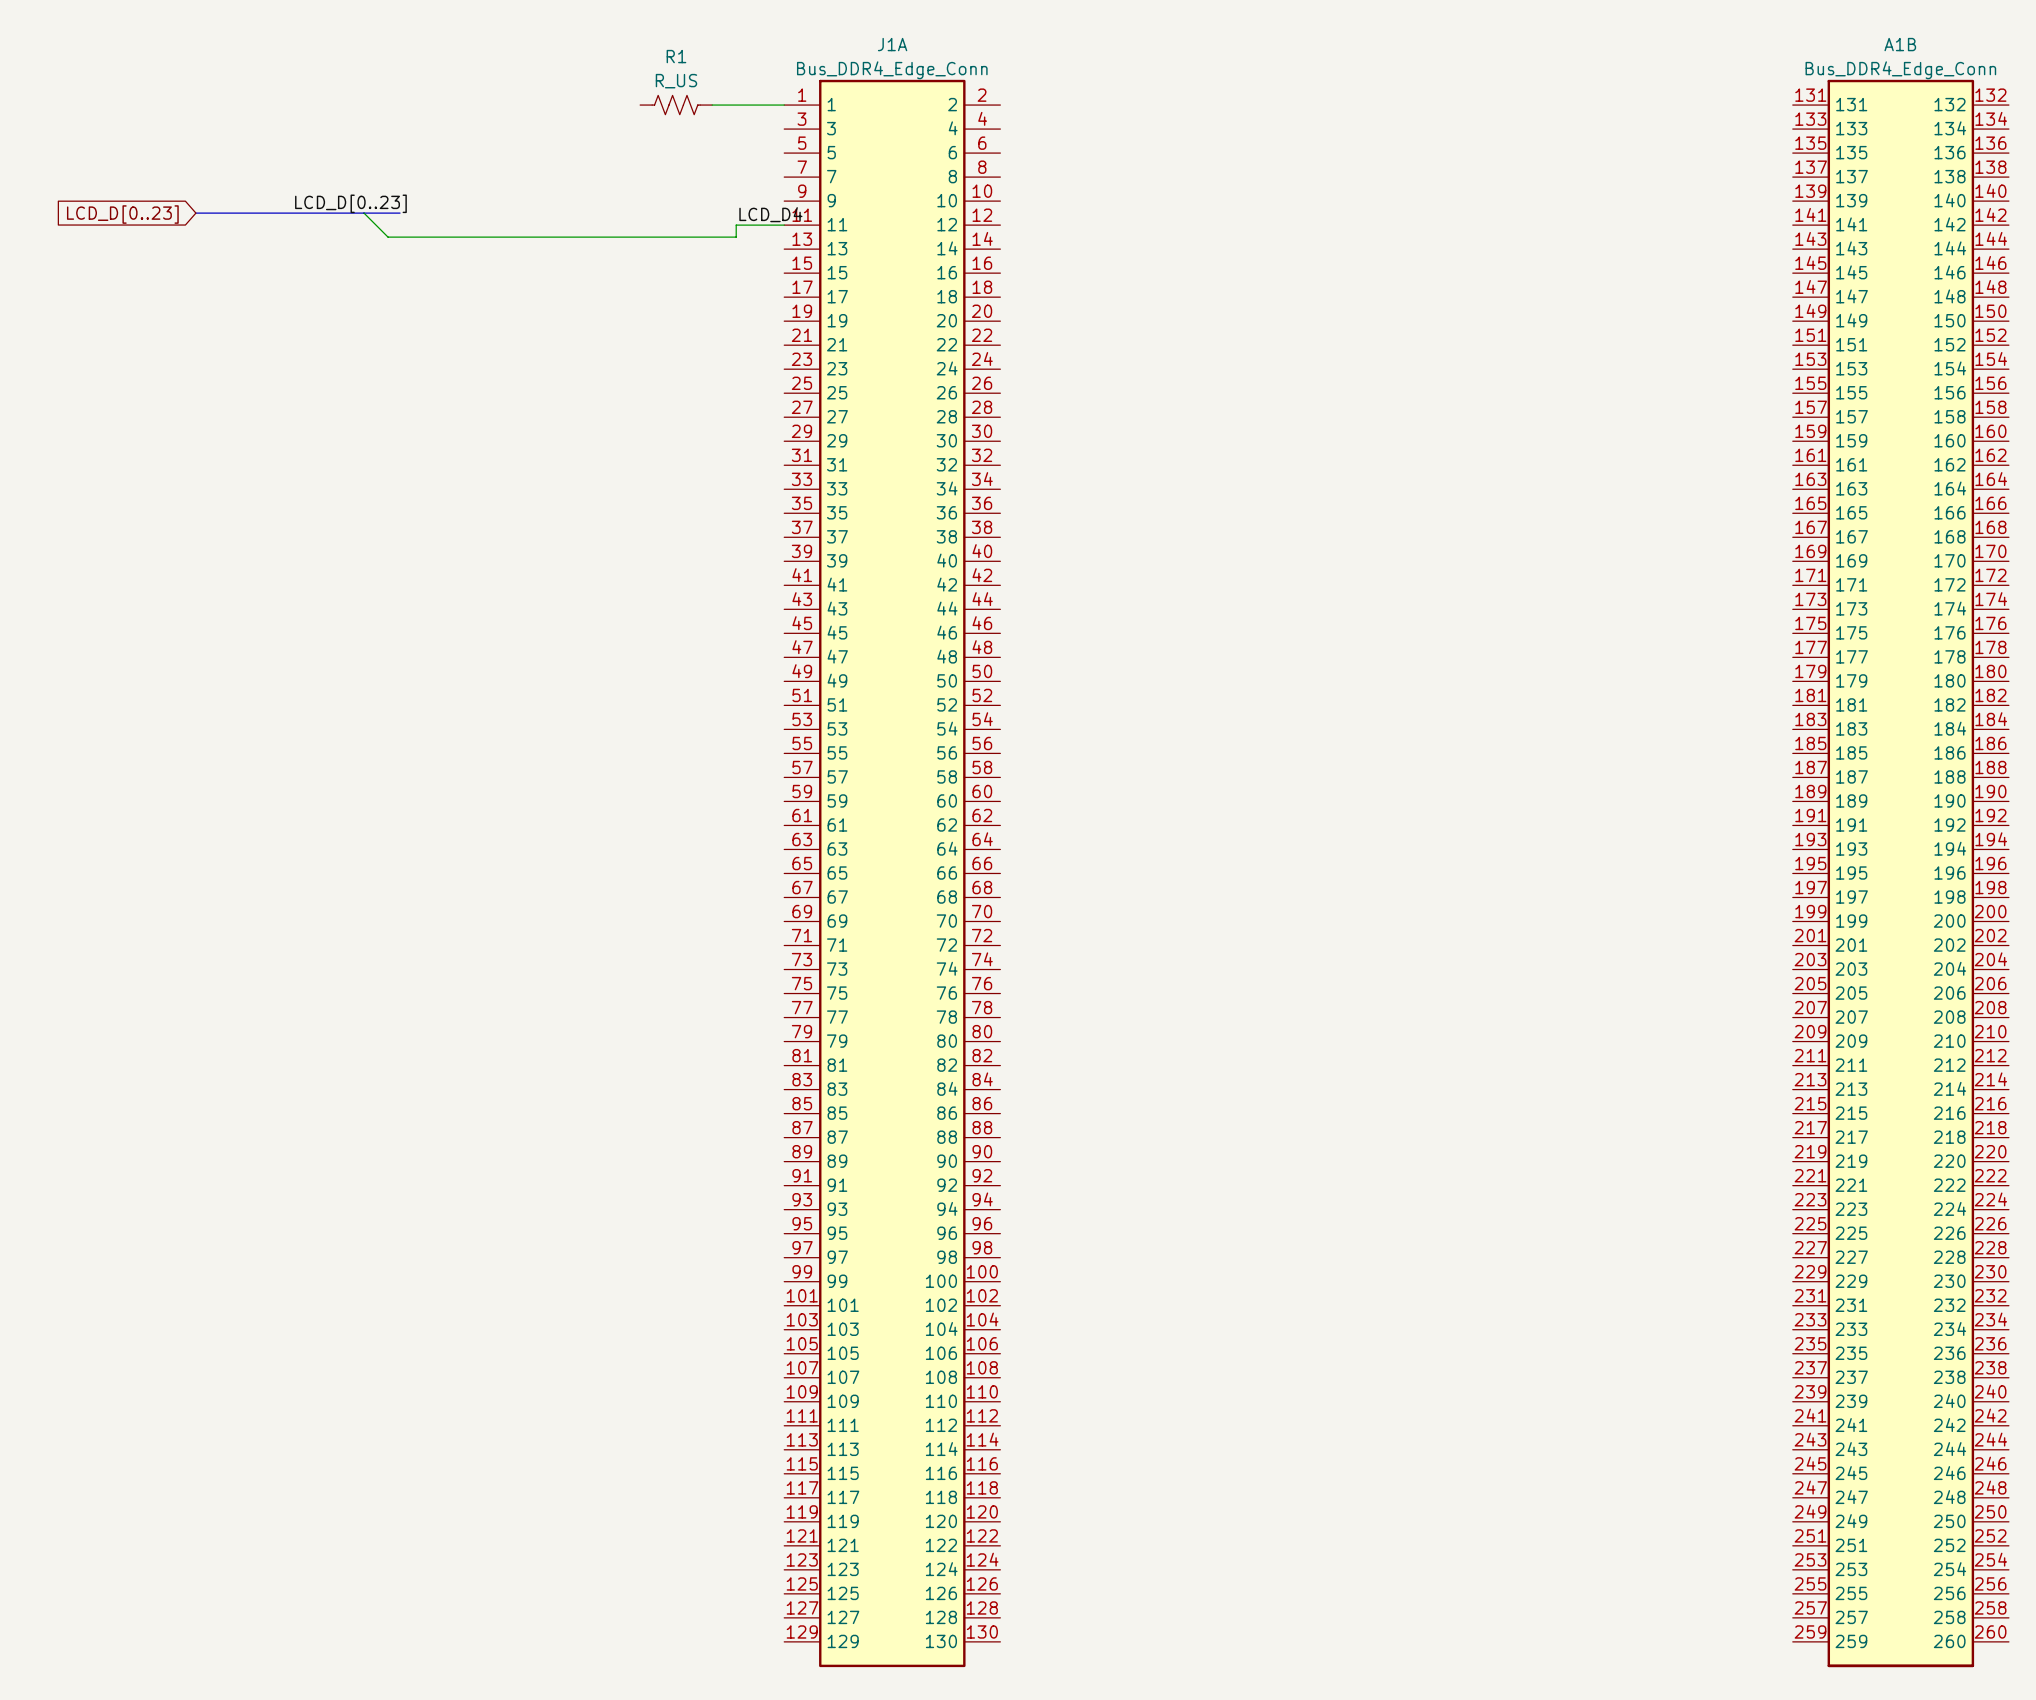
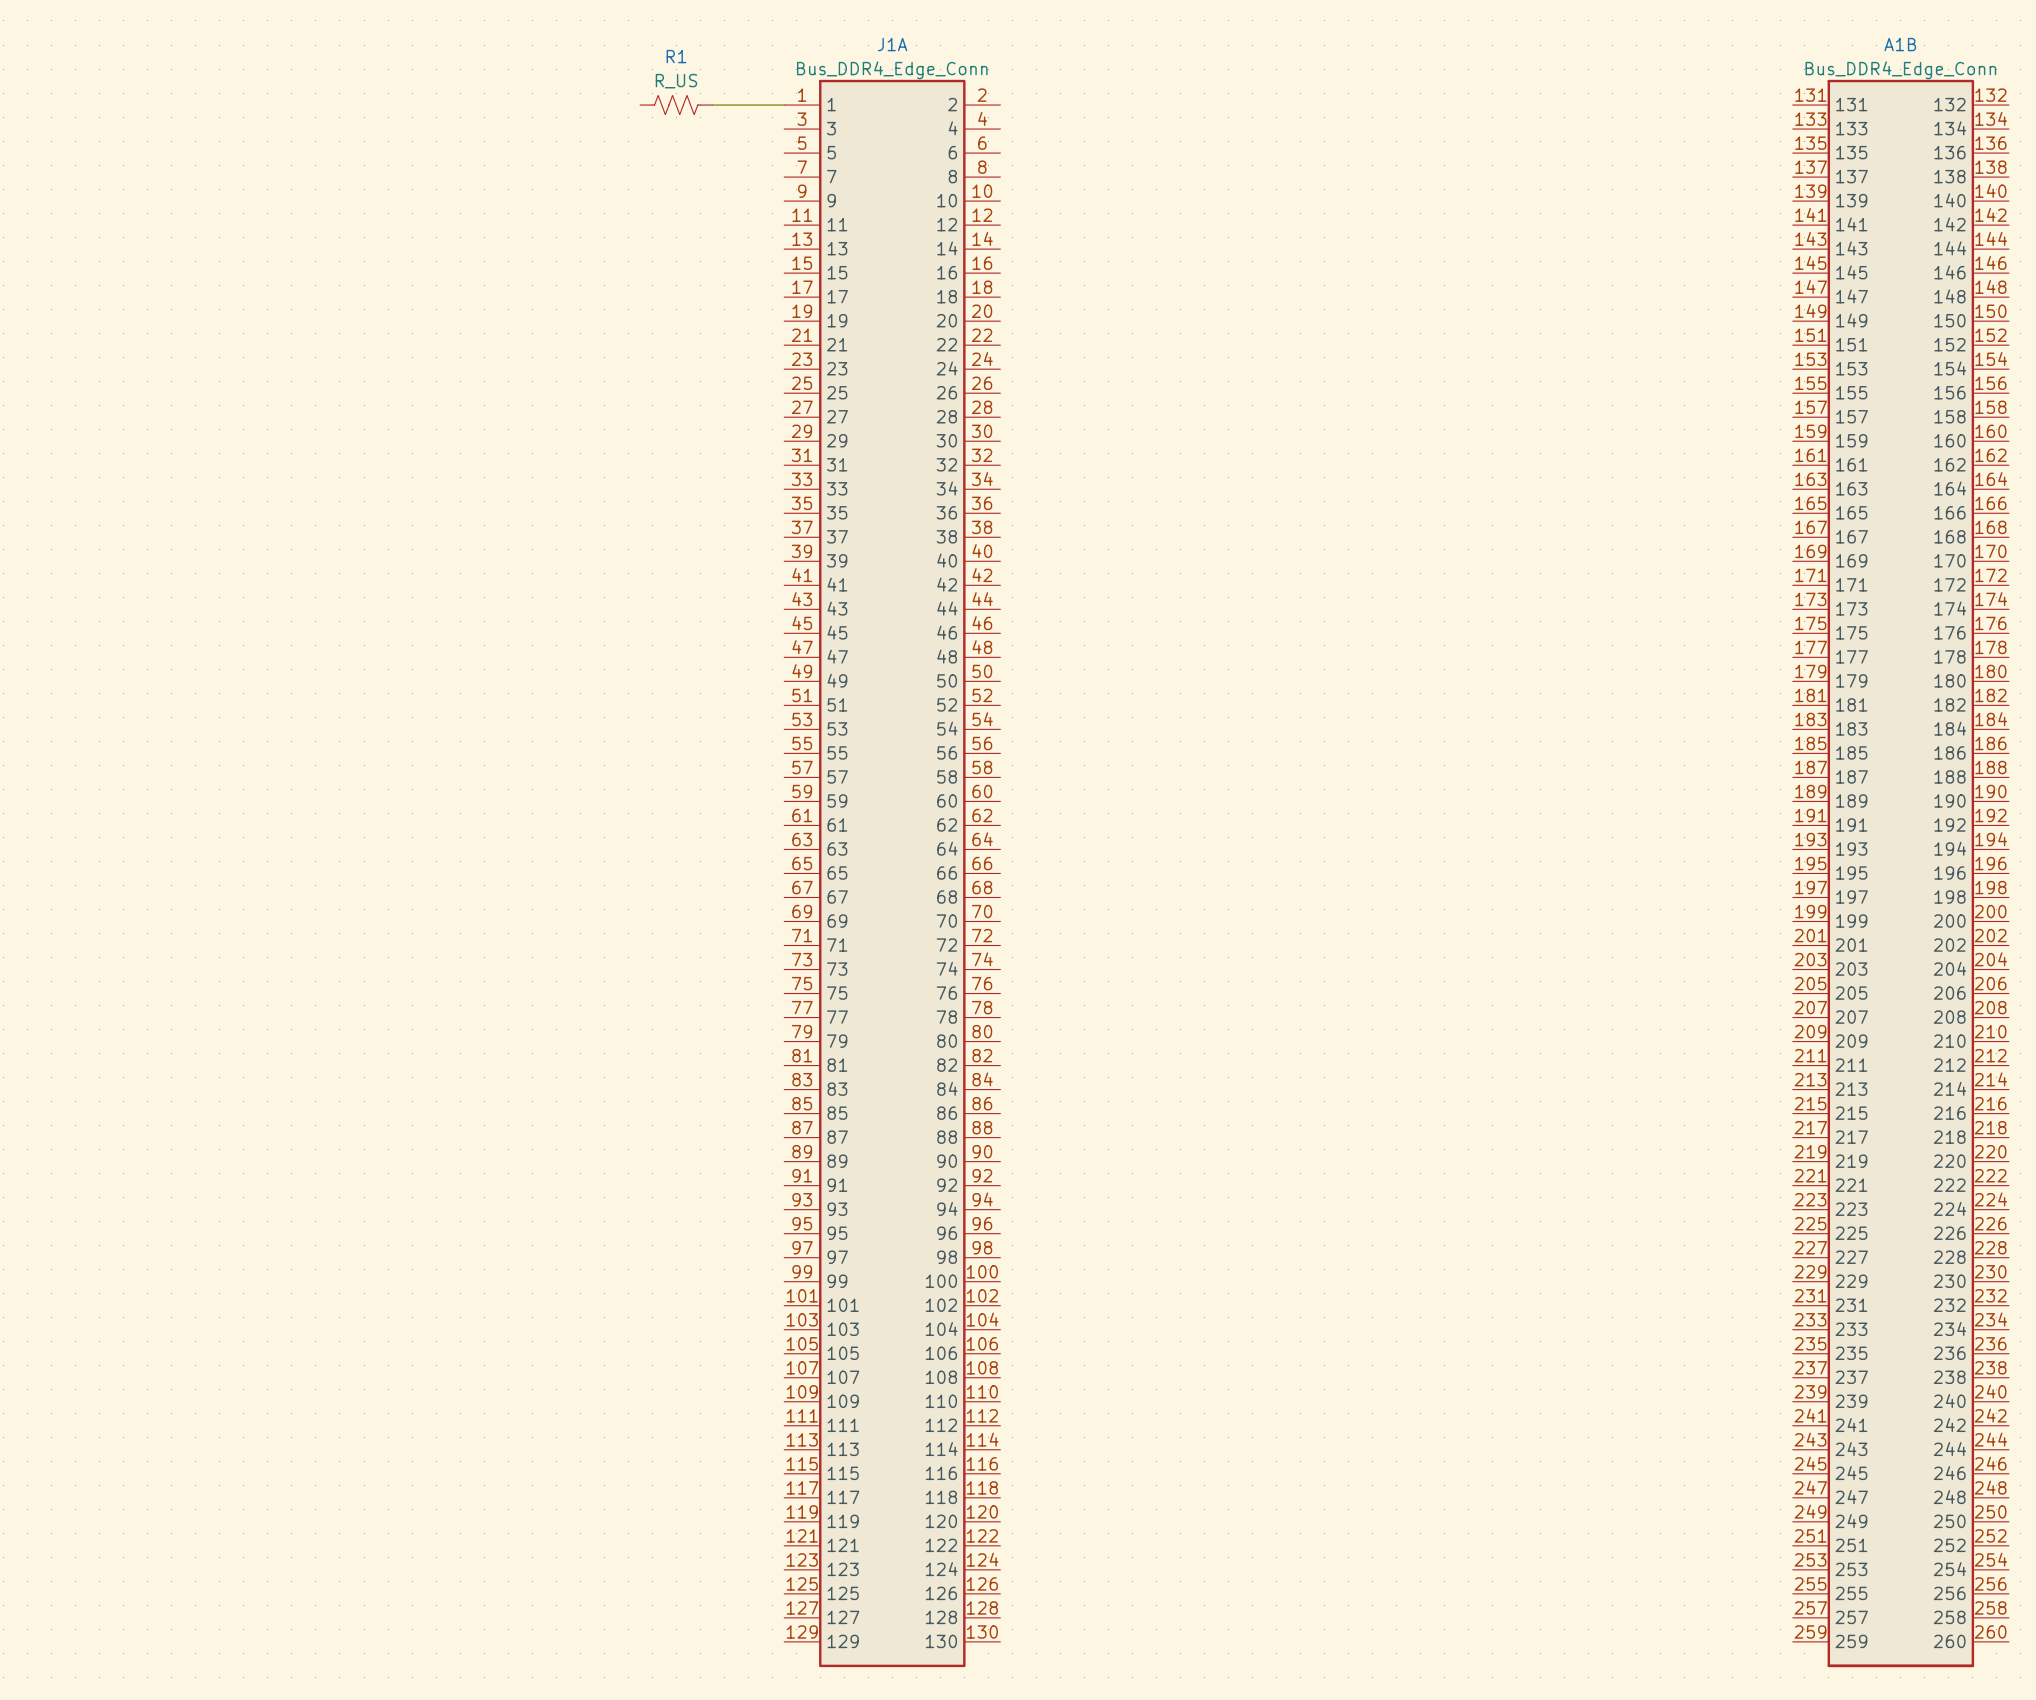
label: LCD_D[0..23] (350, 203) -> none
bus: (195, 213) (400, 213) -> none
wire: (364, 213) (388, 237) (736, 237) (736, 225) (784, 225) -> none
global label: LCD_D[0..23] (122, 214) -> none
label: LCD_D4 (770, 214) -> none

